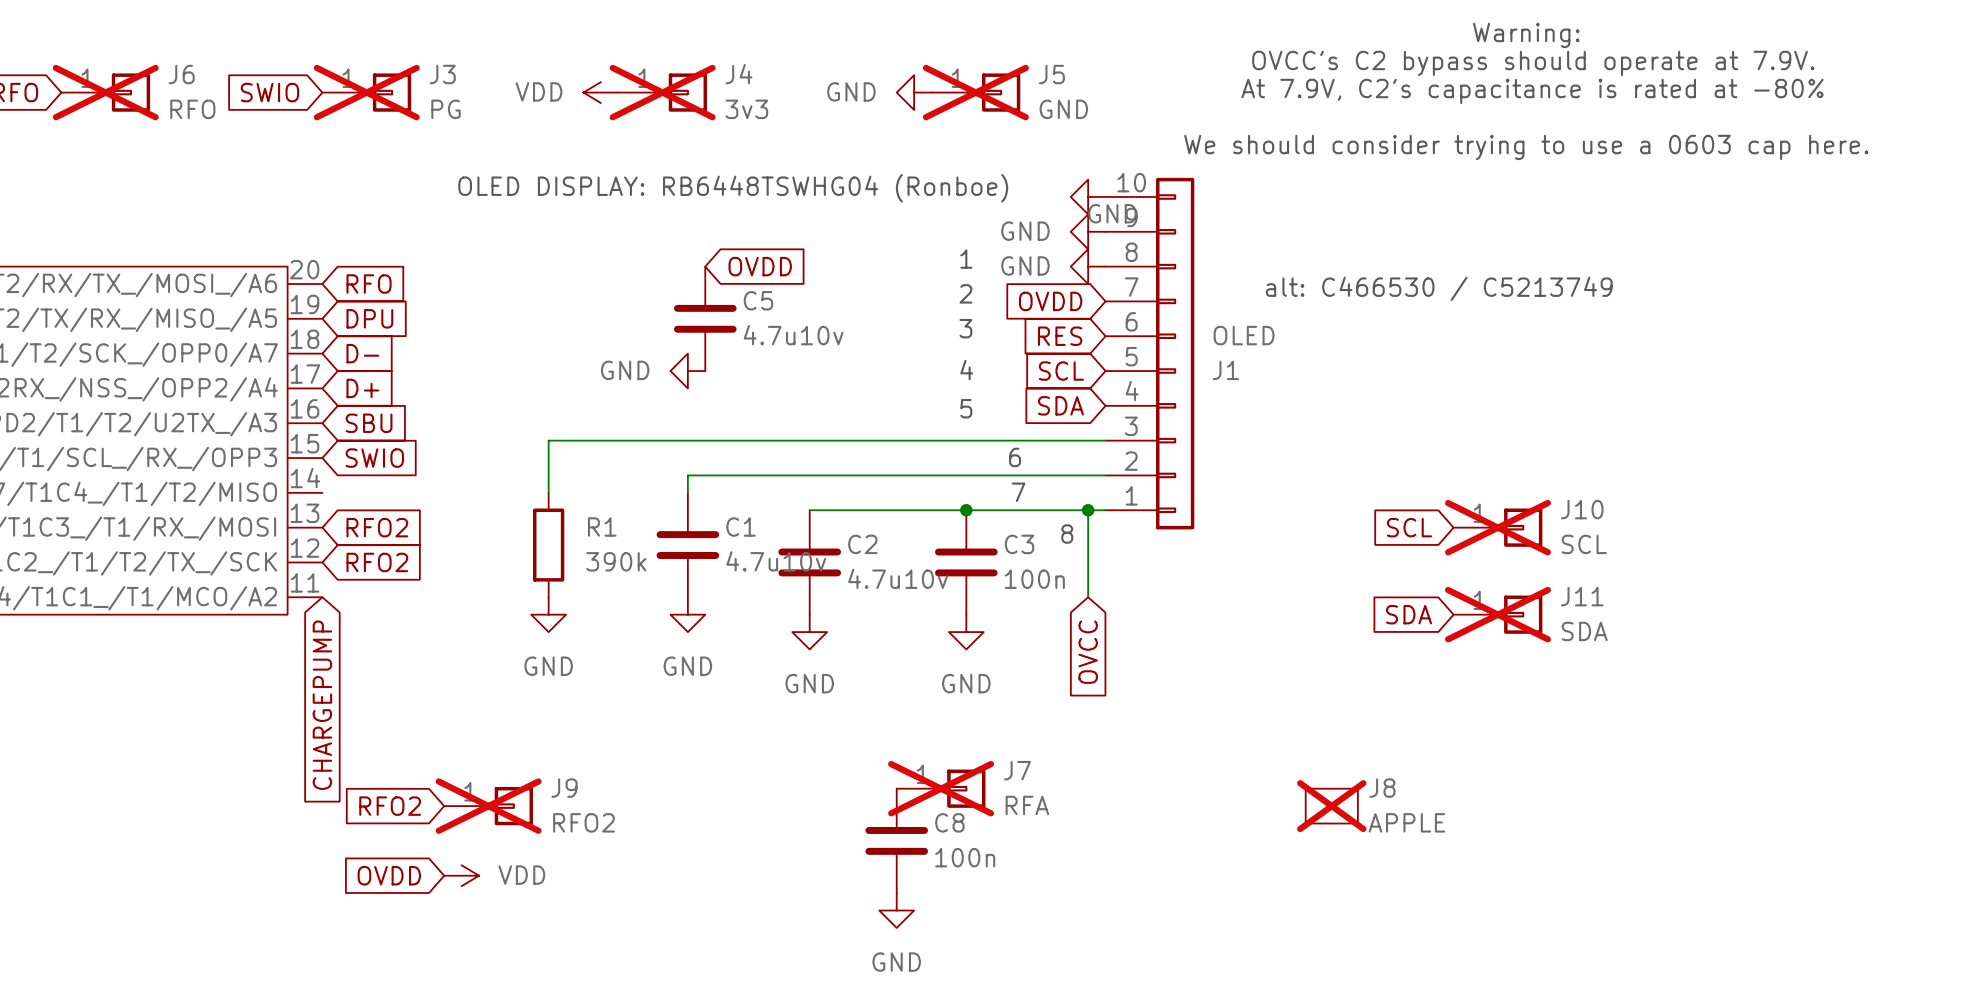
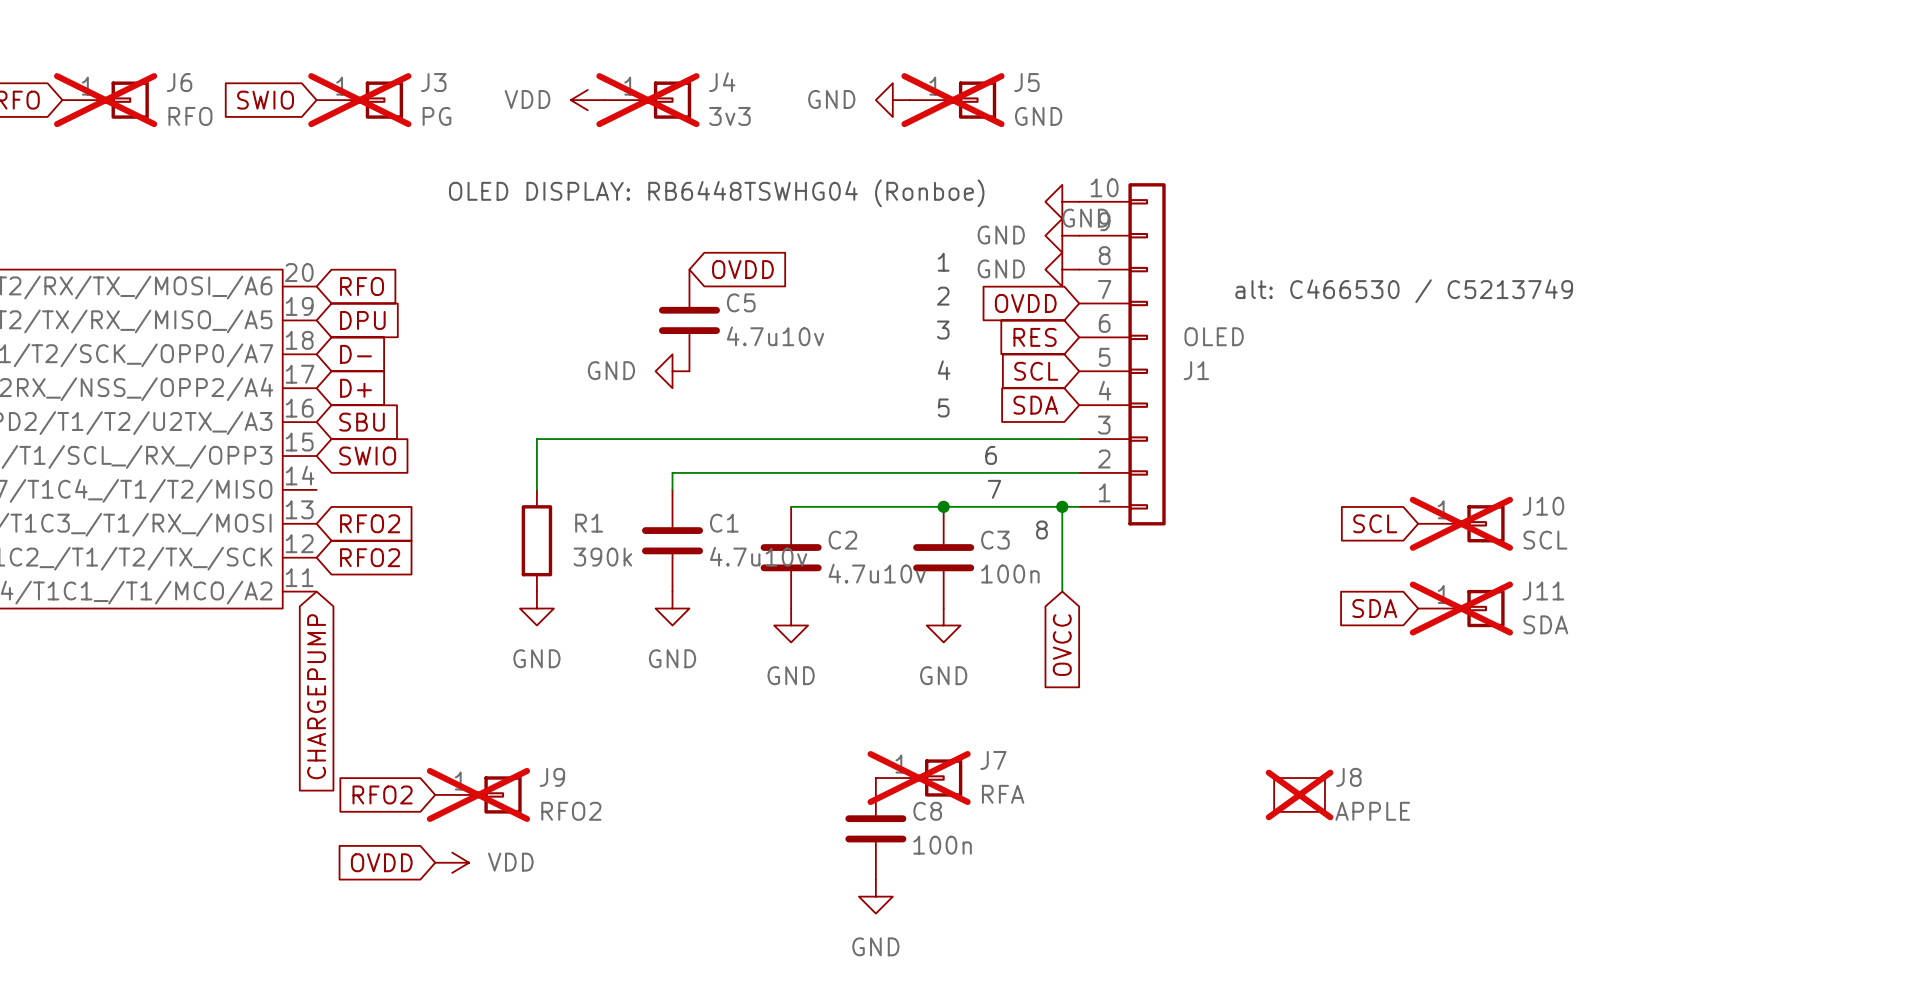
text: Warning: (1526, 35) -> none
text: OVCC's C2 bypass should operate at 7.9V. (1533, 63) -> none
text: At 7.9V, C2's capacitance is rated at -80% (1532, 91) -> none
text: We should consider trying to use a 0603 cap here. (1526, 147) -> none

